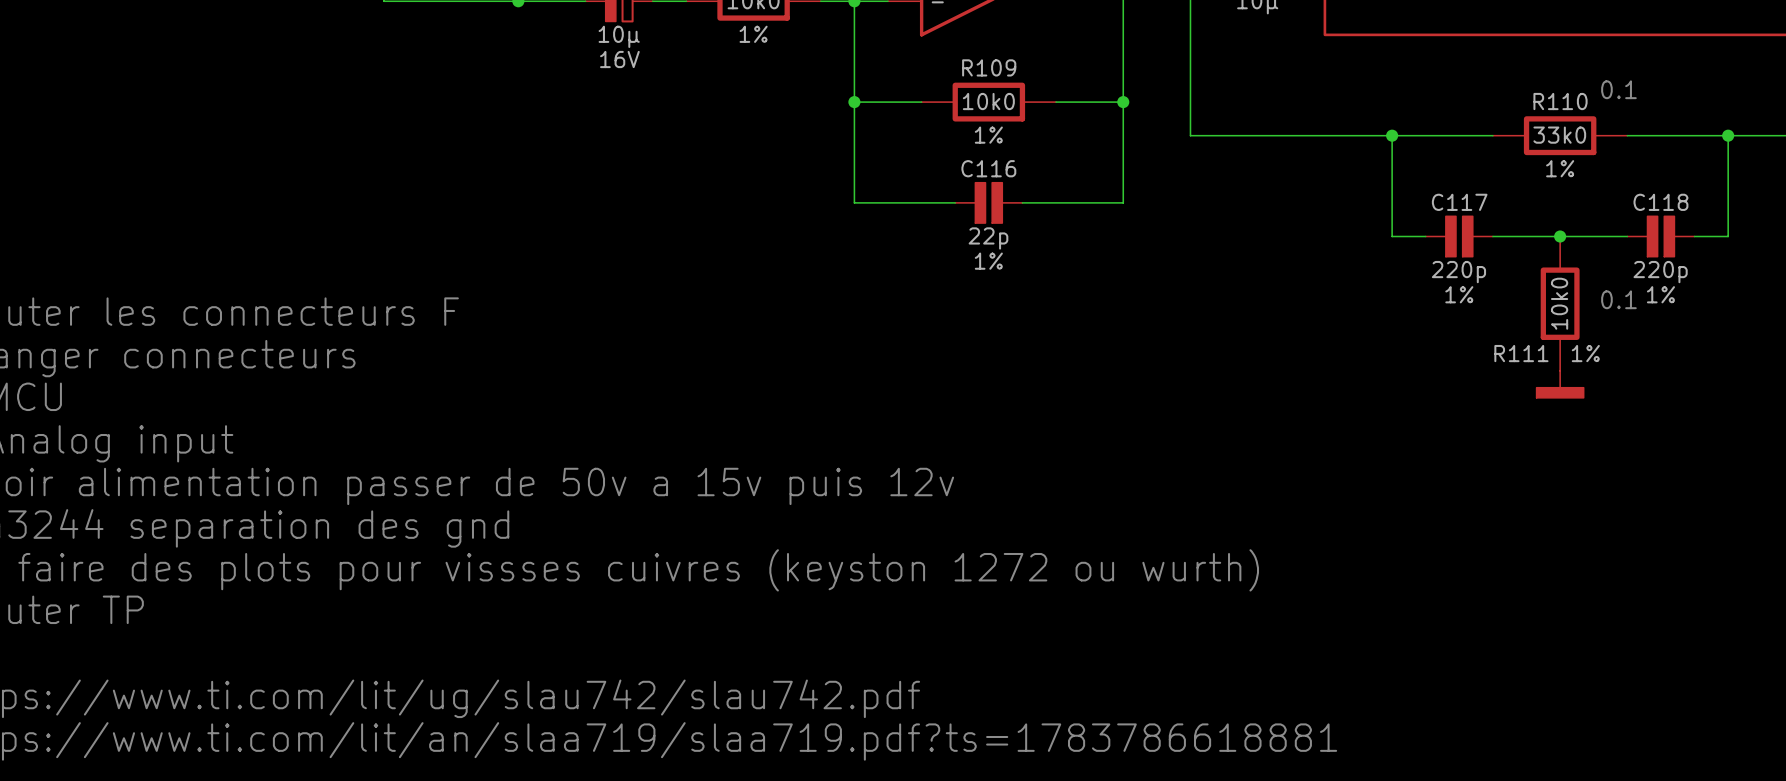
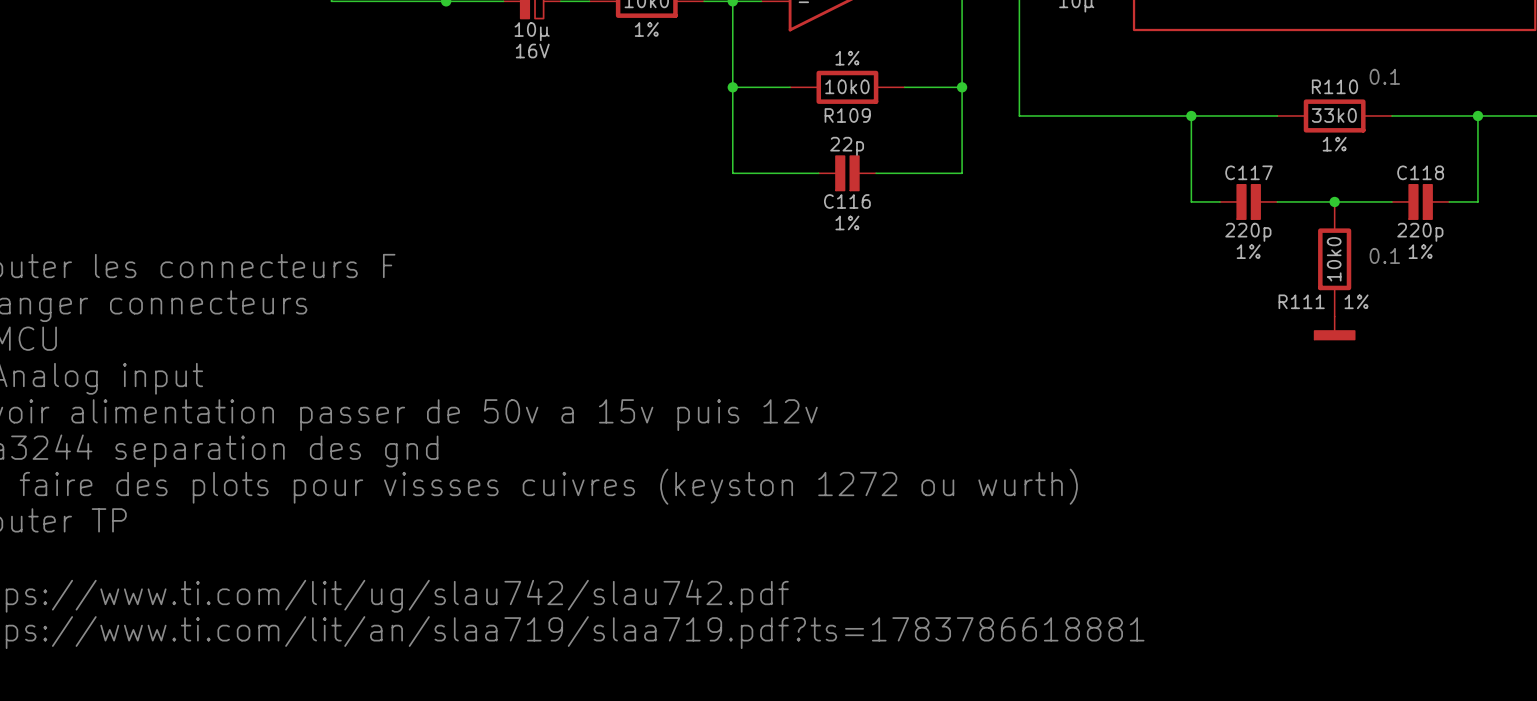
R109 name position: R109 (989, 67) -> R109 (847, 115)
R109 text position: 1% (988, 135) -> 1% (847, 58)
C116 name position: C116 (988, 168) -> C116 (847, 201)
C116 value position: 22p (988, 238) -> 22p (847, 146)

